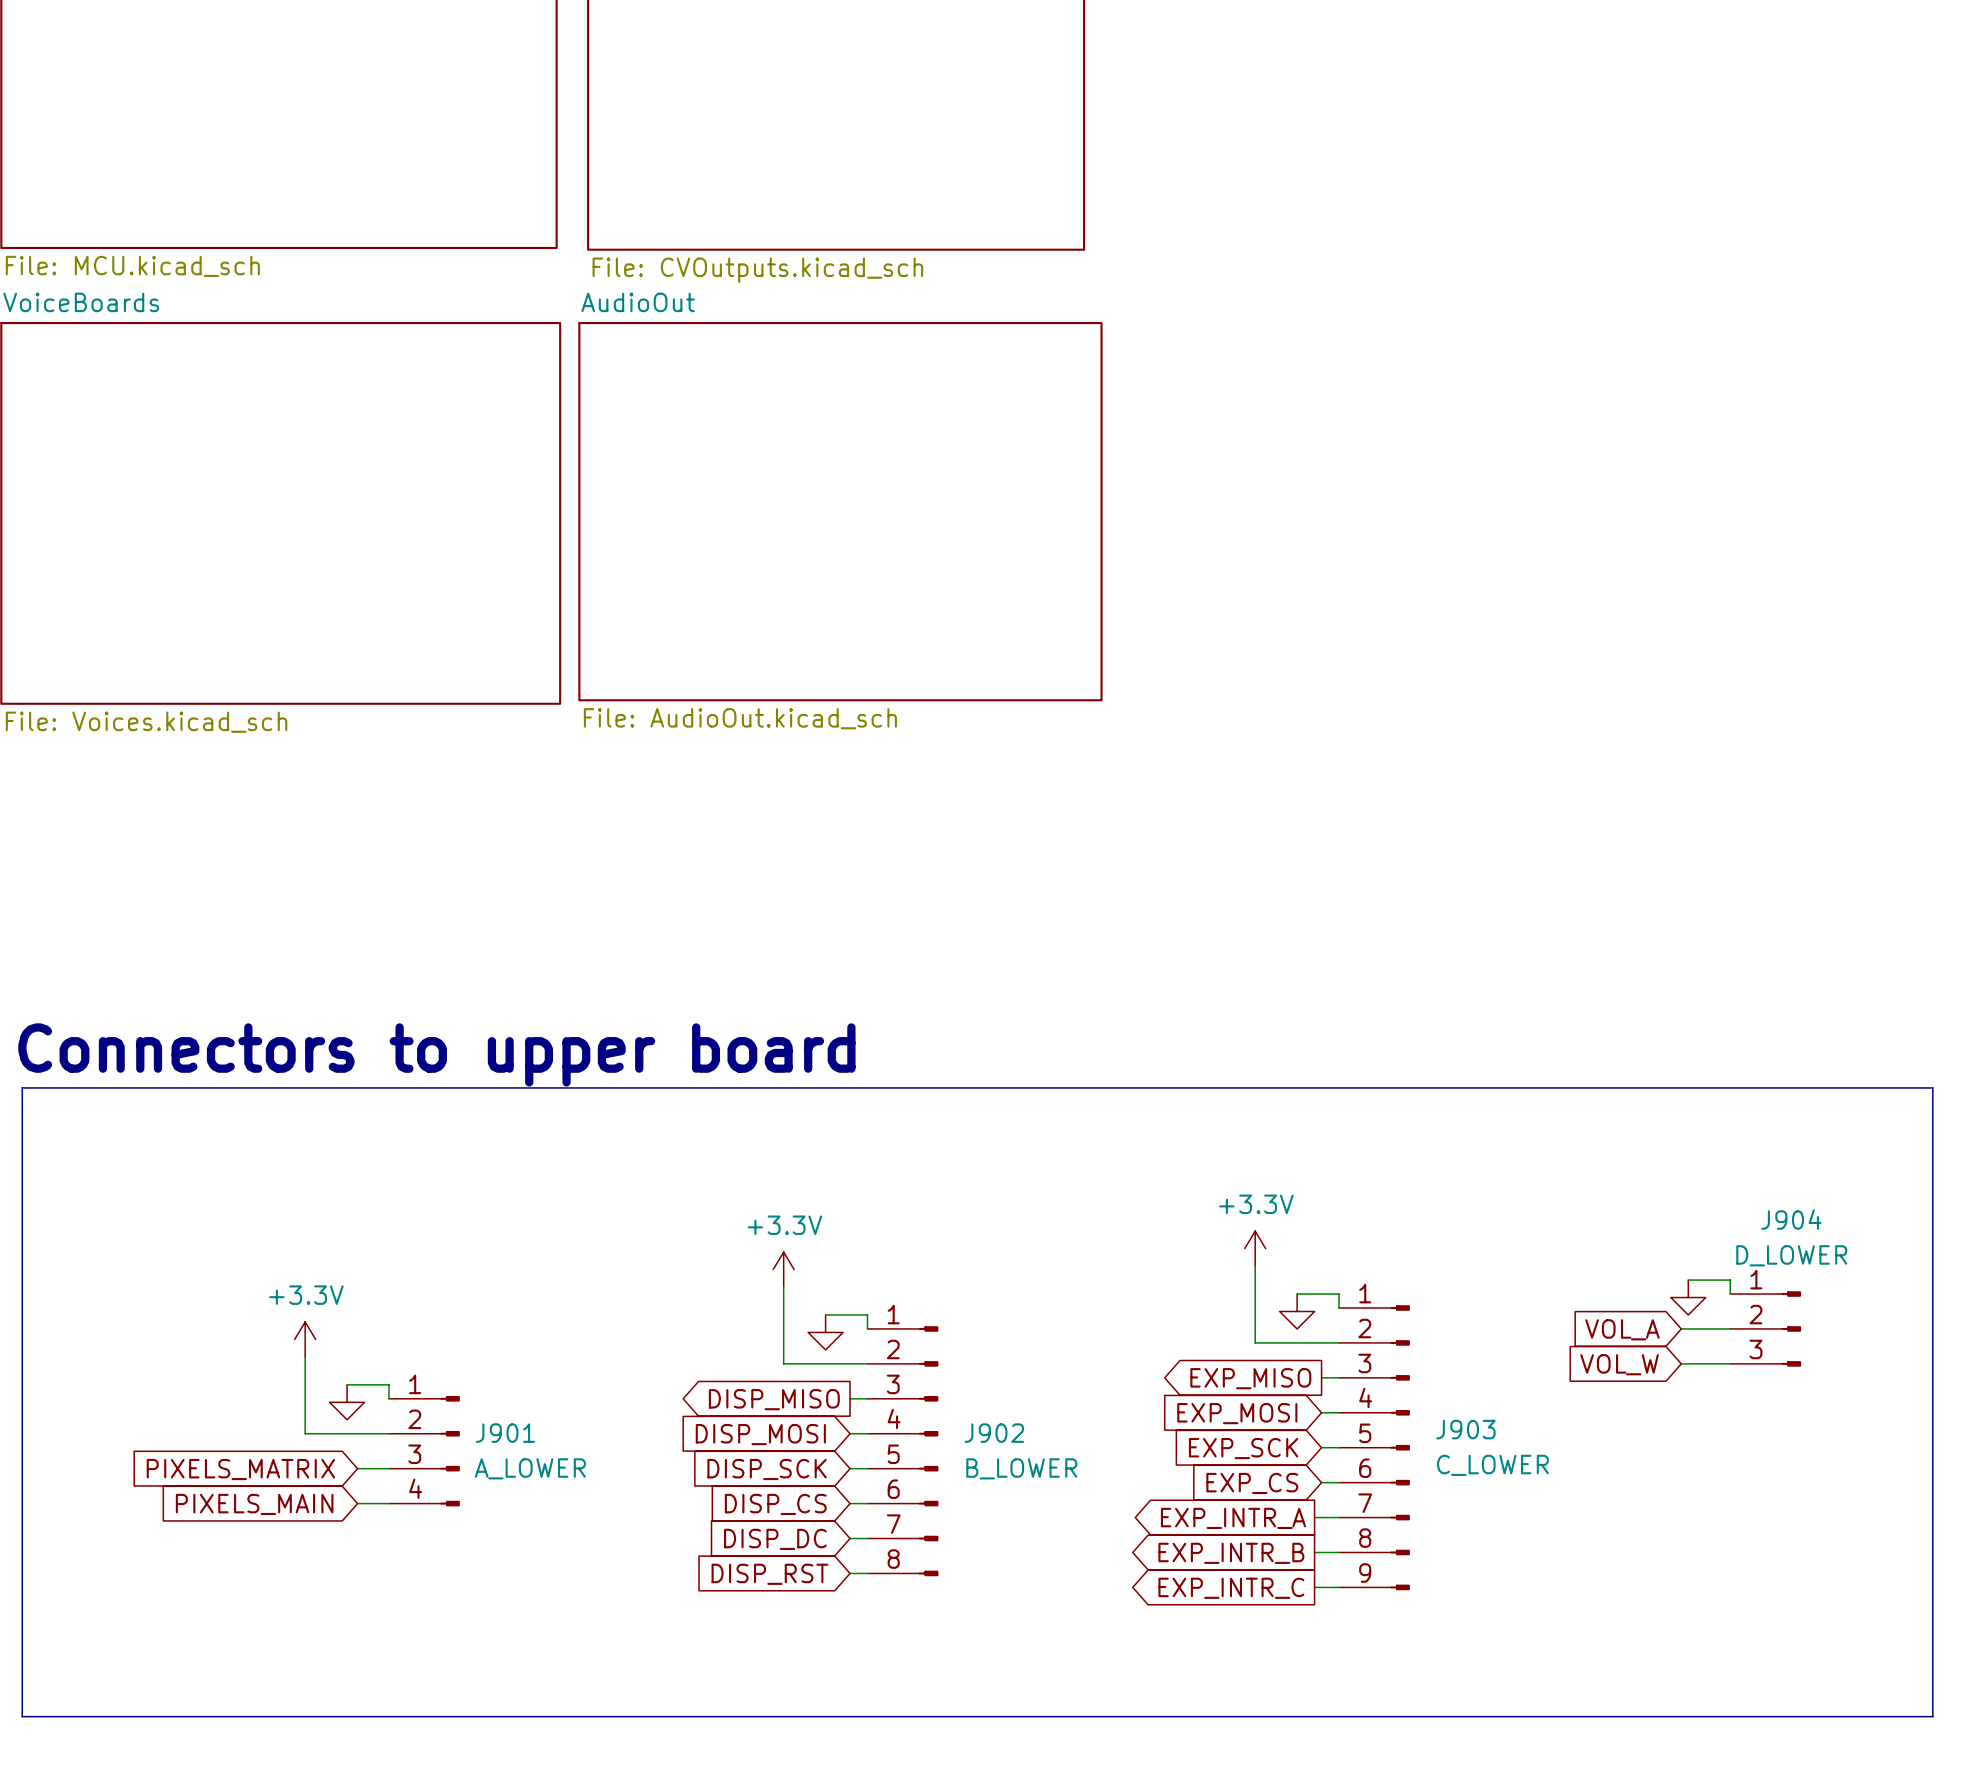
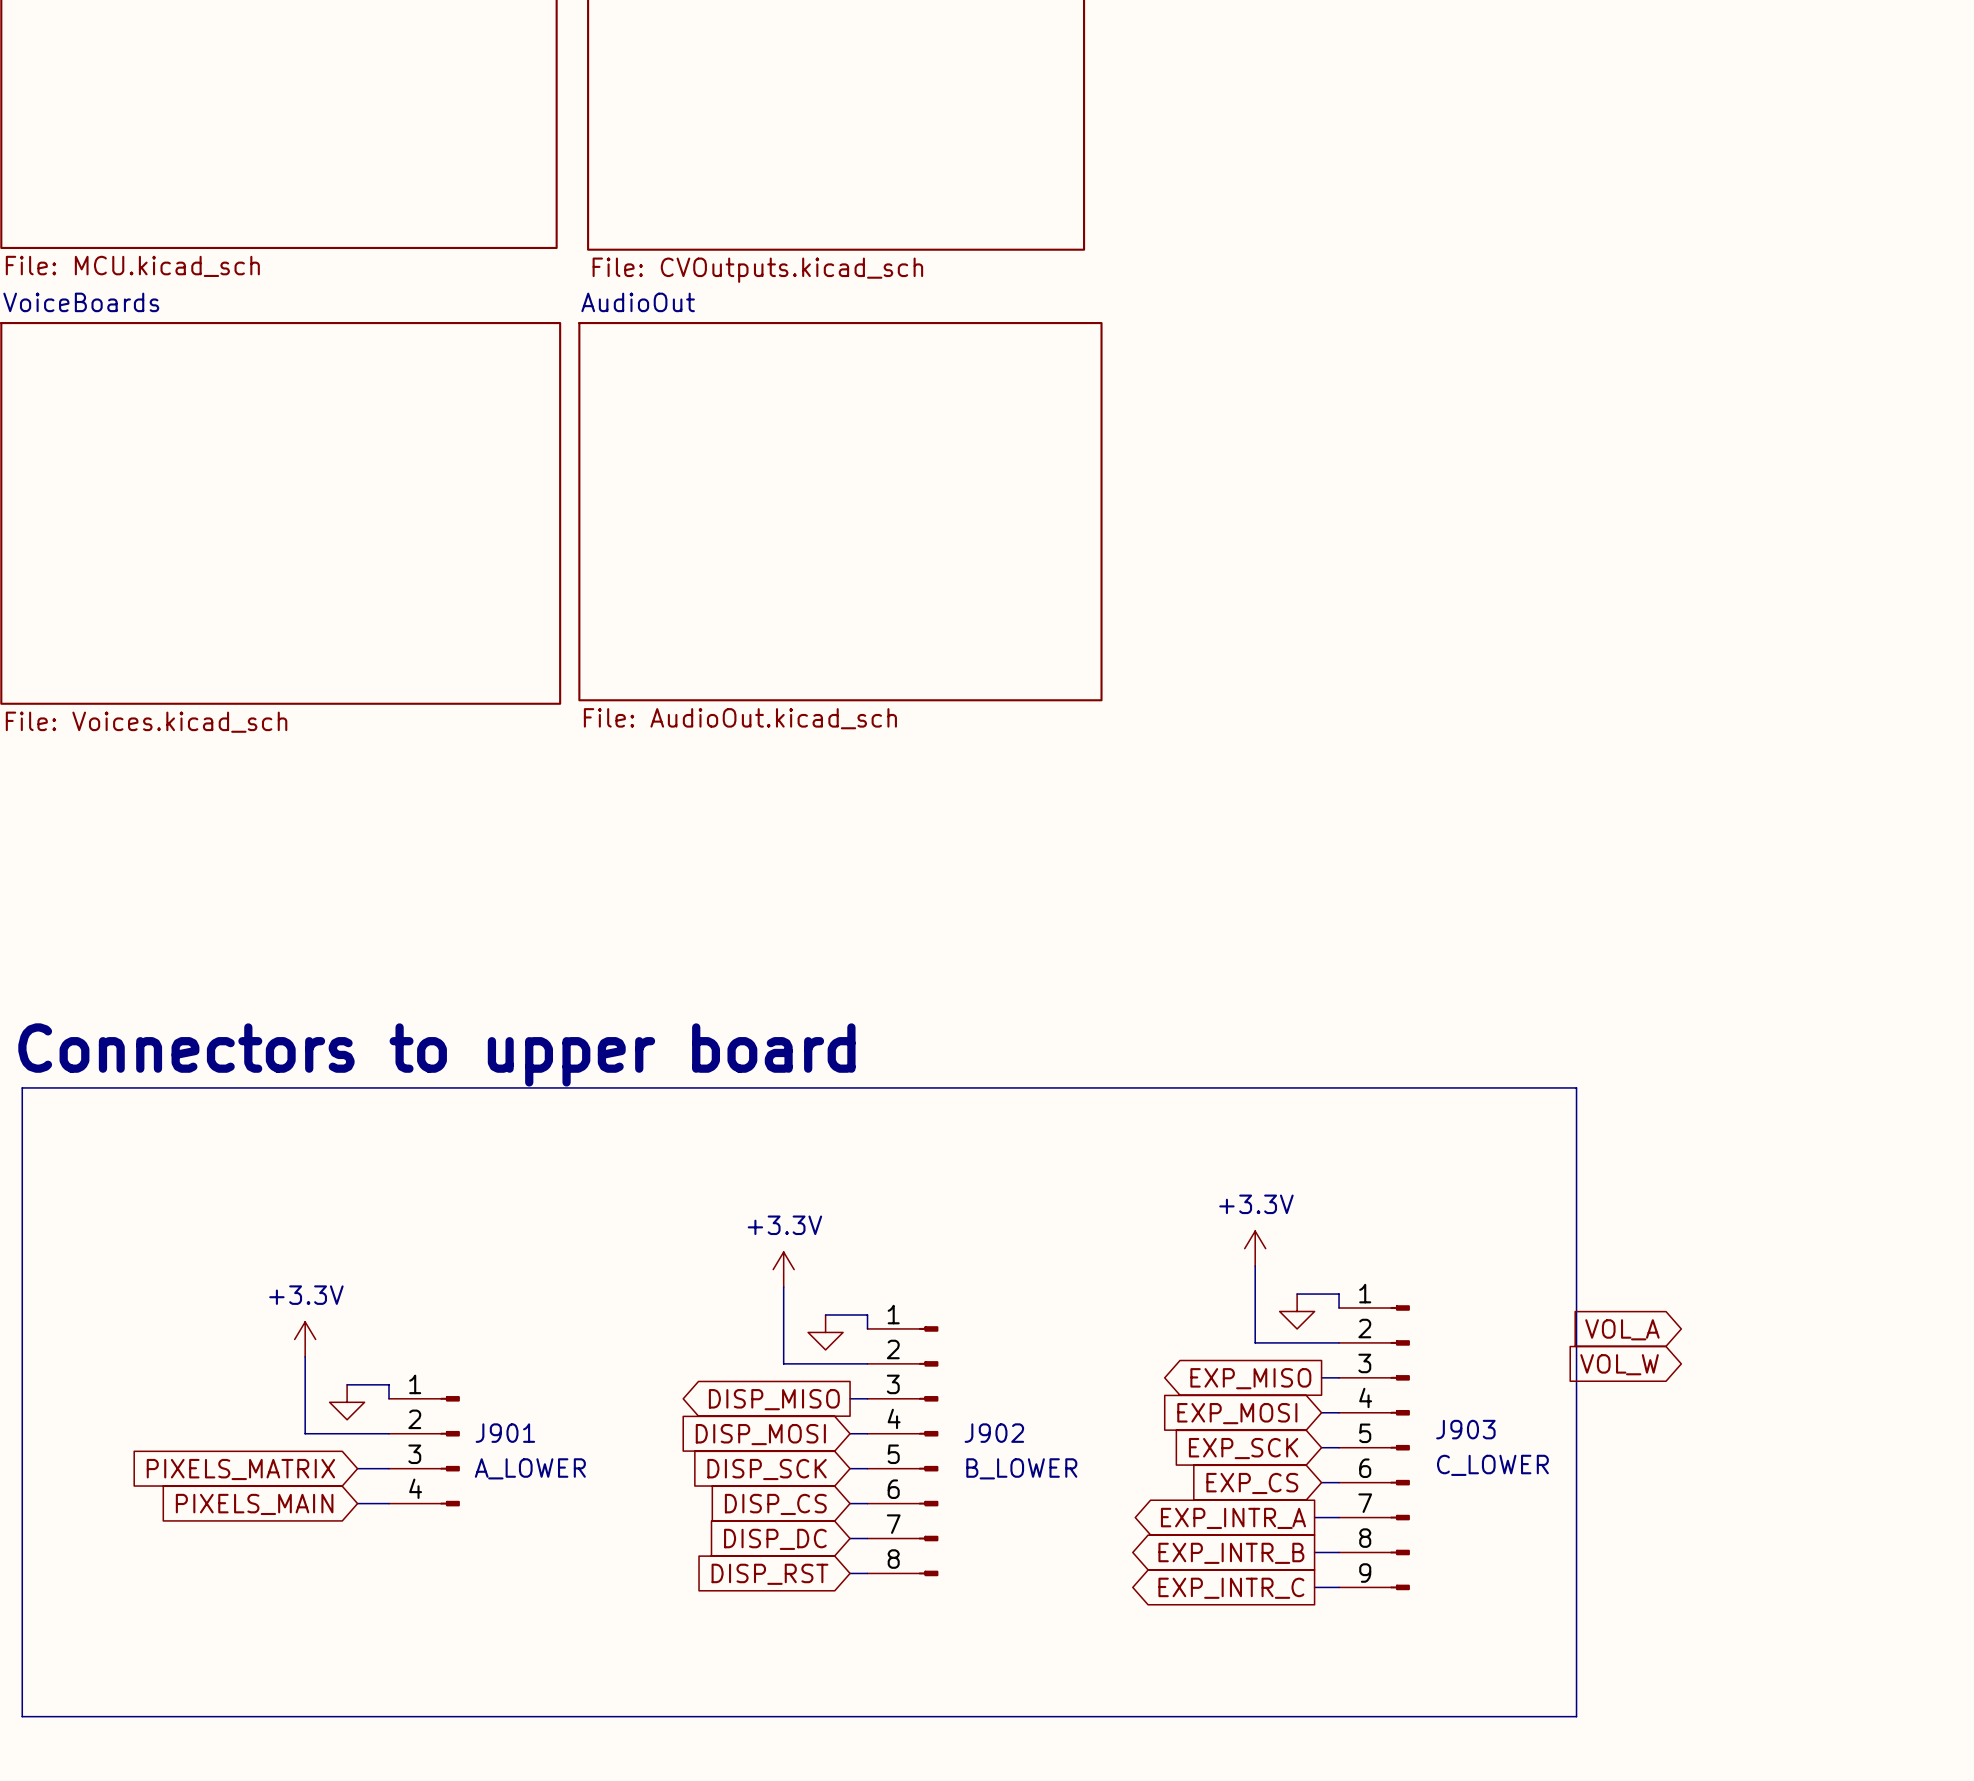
line: (1576, 1087) (1932, 1087) (1932, 1716) (1576, 1716) -> (1576, 1087) (1576, 1716)
wire: (1688, 1280) (1730, 1280) (1730, 1294) -> none
power symbol: (1688, 1297) -> none
wire: (1681, 1328) (1730, 1328) -> none
J904: D_LOWER (1765, 1328) -> none
wire: (1681, 1363) (1730, 1363) -> none

